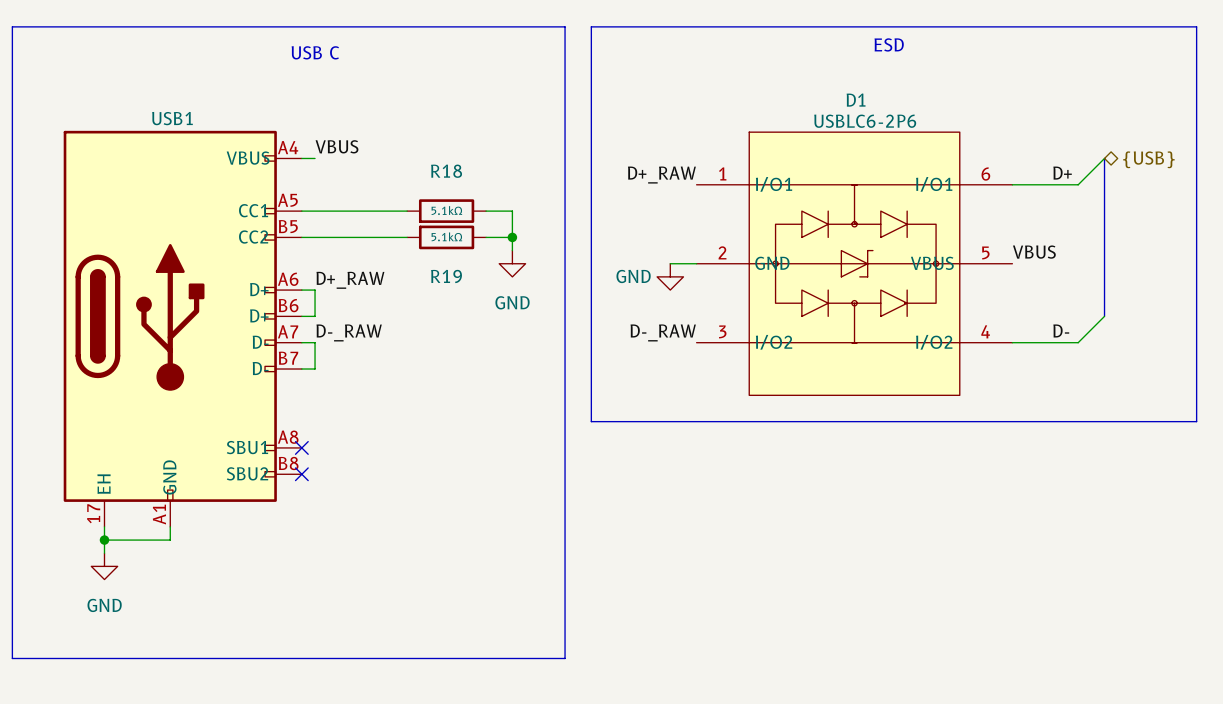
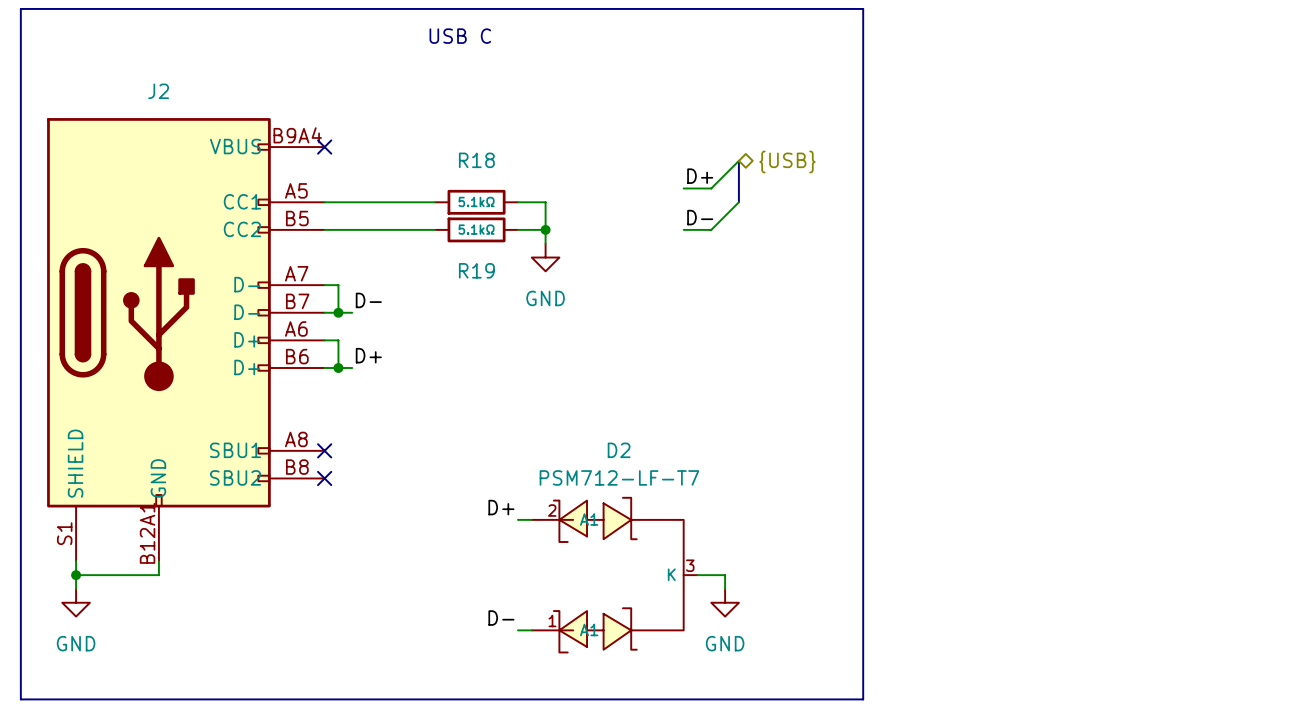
line: (565, 26) (565, 658) (12, 658) -> (863, 8) (863, 699) (20, 699) (20, 671)
line: (591, 26) (591, 421) (1196, 421) (1196, 26) (815, 26) -> (628, 8) (600, 8)
text: ESD (889, 44) -> none
text position: USB C (315, 52) -> USB C (460, 36)
label: VBUS (336, 146) -> none
wire: (301, 158) (315, 158) -> (338, 312) (352, 312)
no-connect mark: none -> (324, 147)
wire: (1104, 158) (1078, 184) (1012, 184) -> none
bus: (1104, 158) (1104, 316) -> none
hierarchical label: {USB} (1148, 159) -> none
wire: none -> (738, 160) (711, 188) (683, 188)
bus: none -> (738, 160) (738, 202)
hierarchical label: none -> {USB} (787, 161)
label: D+ (1062, 173) -> none
label: D+_RAW (661, 175) -> none
label: none -> D+ (700, 176)
wire: none -> (738, 202) (711, 229) (683, 229)
label: none -> D- (700, 217)
label: VBUS (1034, 252) -> none
wire: (670, 263) (696, 263) -> none
D1: USBLC6-2P6 (854, 263) -> none
power symbol: GND (670, 276) -> none
label: D+_RAW (350, 280) -> none
label: none -> D- (368, 300)
junction: none -> (338, 312)
wire: (1104, 316) (1078, 342) (1012, 342) -> none
USB1: (182, 328) -> none
label: D- (1061, 330) -> none
label: D-_RAW (349, 332) -> none
label: D-_RAW (663, 332) -> none
J2: none -> (185, 339)
label: none -> D+ (368, 355)
wire: none -> (338, 368) (352, 368)
junction: none -> (338, 368)
label: none -> D+ (501, 507)
wire: none -> (517, 519) (531, 519)
wire: (104, 526) (104, 553) -> (76, 561) (76, 588)
wire: (170, 526) (170, 540) (104, 540) -> none
junction position: (104, 540) -> (76, 575)
wire: none -> (158, 561) (158, 575) (76, 575)
power symbol position: GND (104, 566) -> GND (76, 602)
D2: none -> PSM712-LF-T7 (614, 575)
wire: none -> (697, 575) (725, 575) (725, 588)
power symbol: none -> GND (725, 602)
label: none -> D- (501, 618)
wire: none -> (517, 630) (531, 630)

